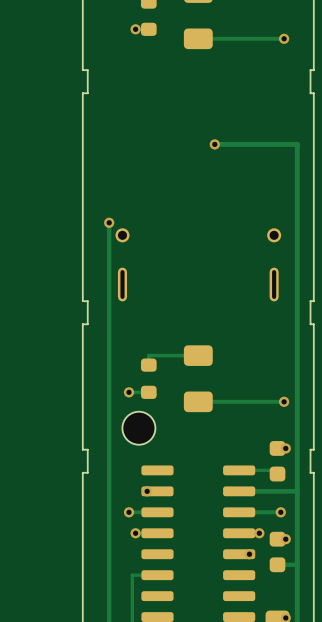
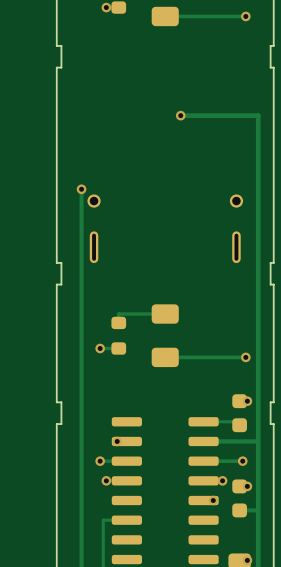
part: (138, 428) -> none

